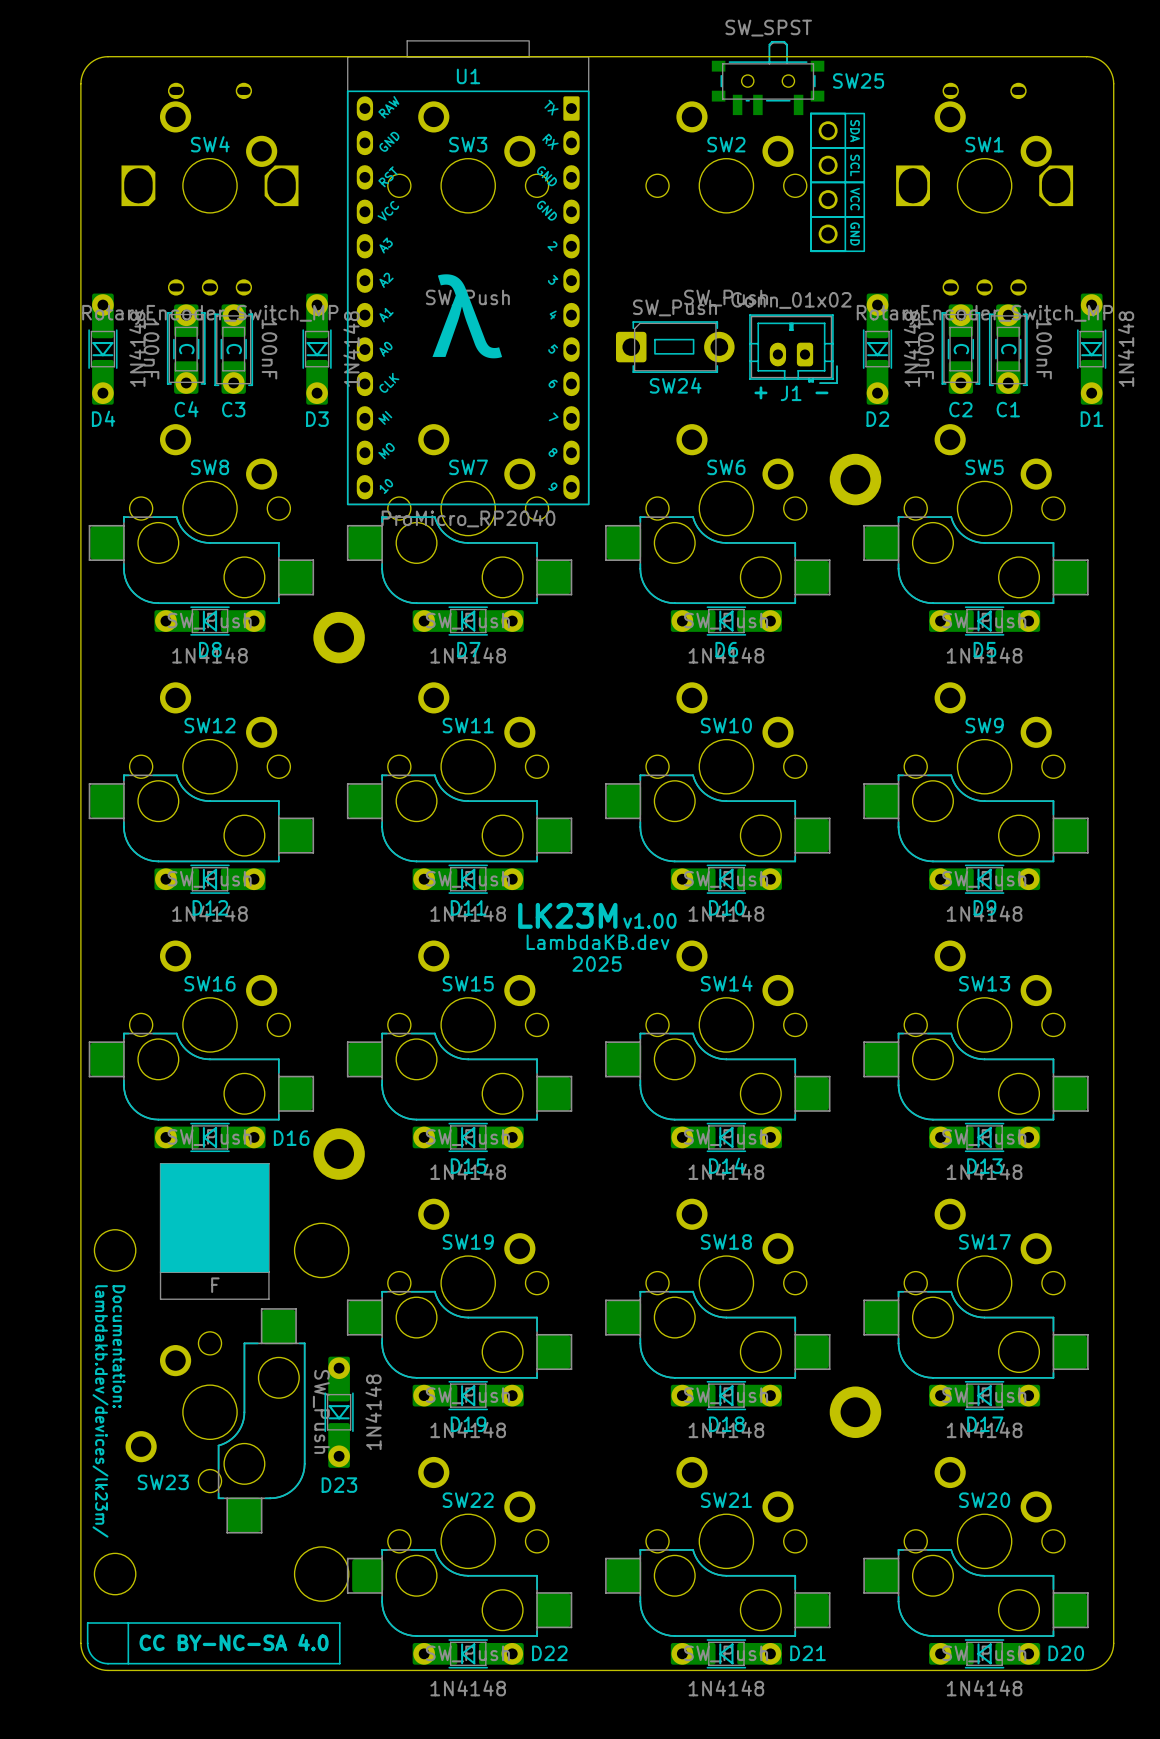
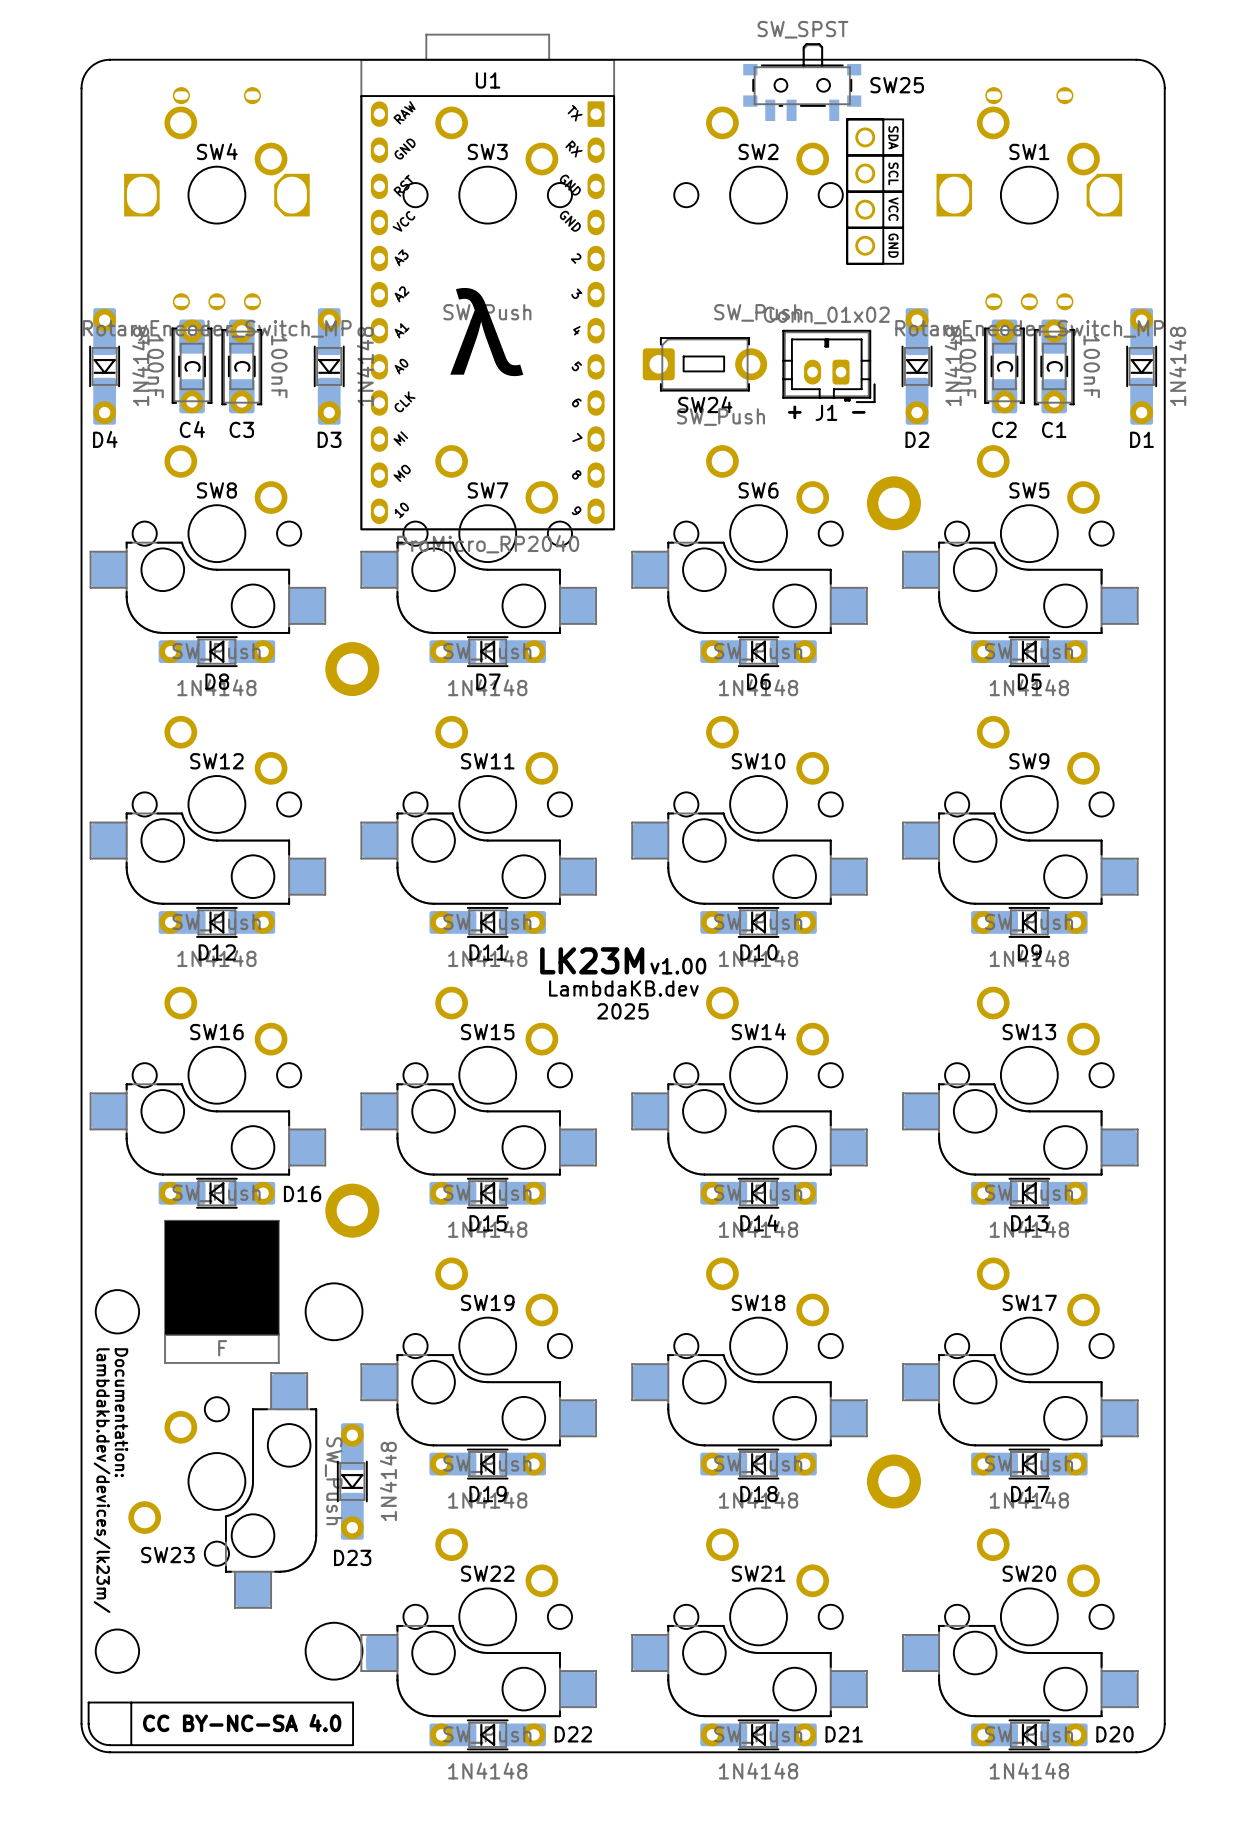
U1 footprint: [346, 40, 590, 506] -> [360, 33, 615, 531]
SW24 value position: SW_Push (674, 307) -> SW_Push (720, 417)

